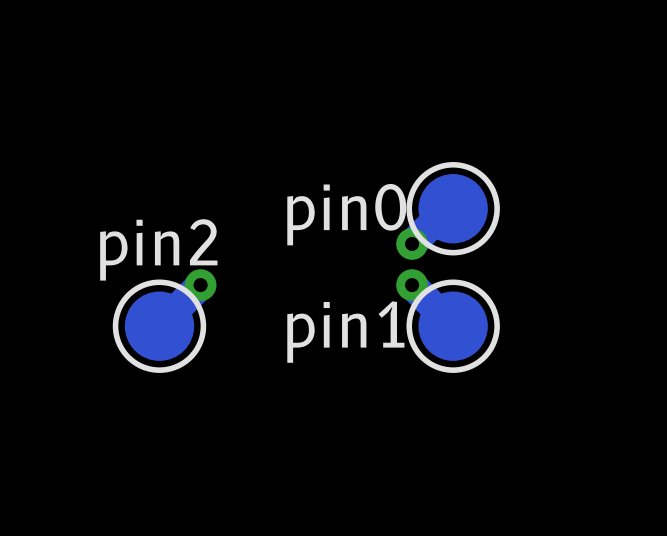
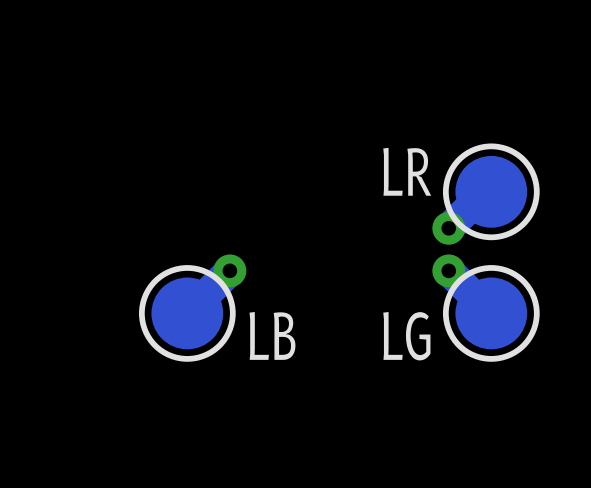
text: pin0 (346, 214) -> LR (407, 171)
text: pin2 (158, 249) -> none
text: pin1 (345, 332) -> none
text: none -> LB (272, 335)
text: none -> LG (406, 336)

